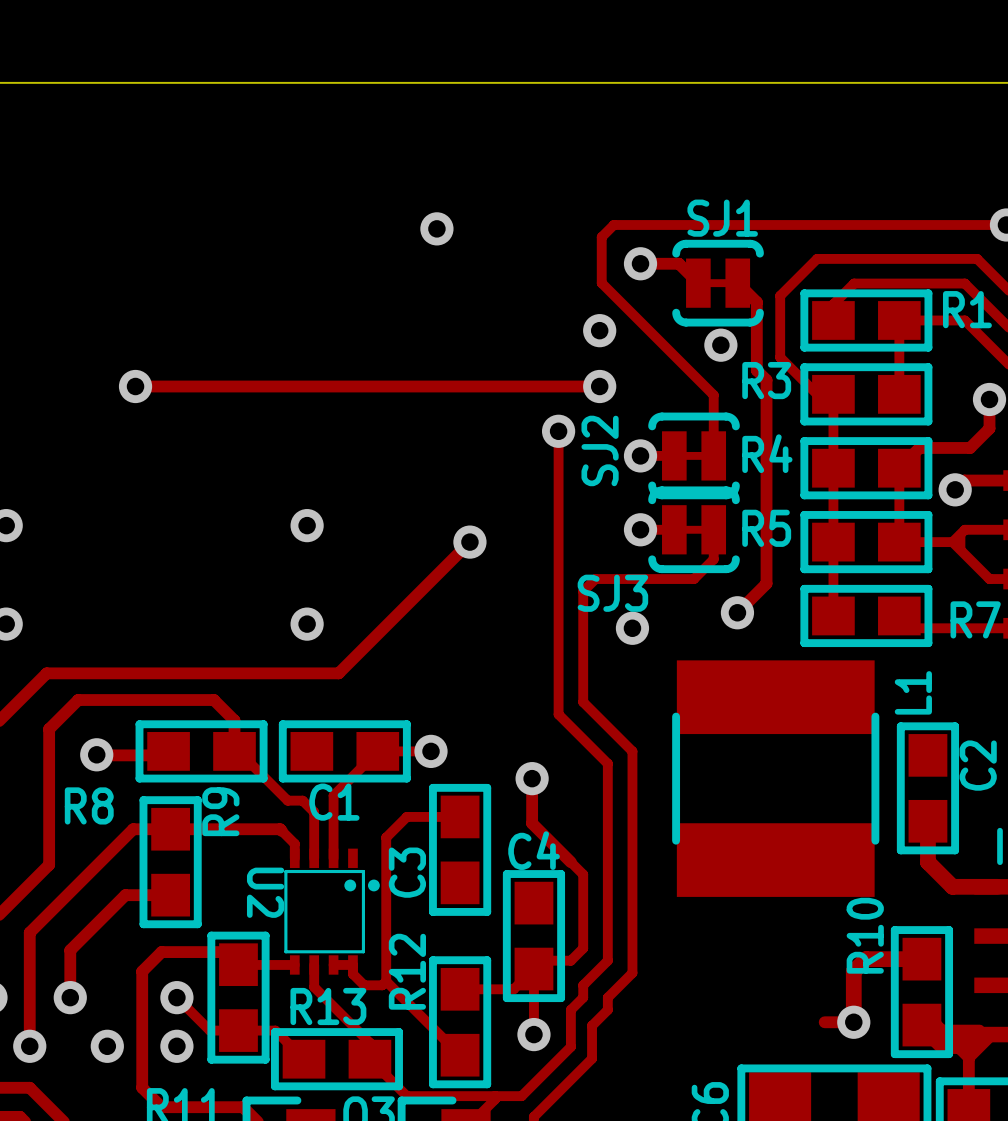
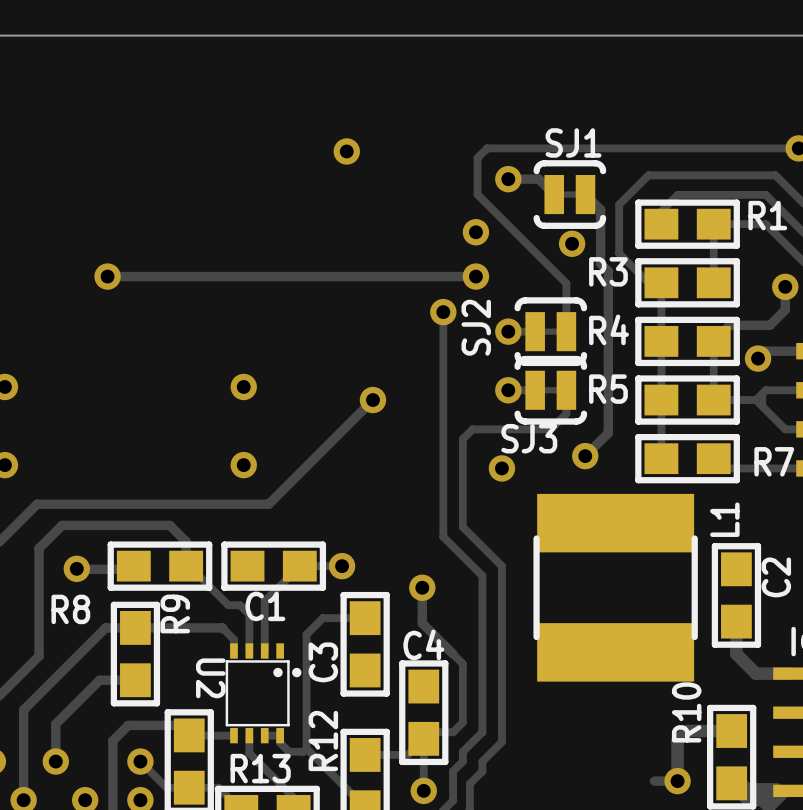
SJ3 name position: SJ3 (612, 593) -> SJ3 (529, 438)

